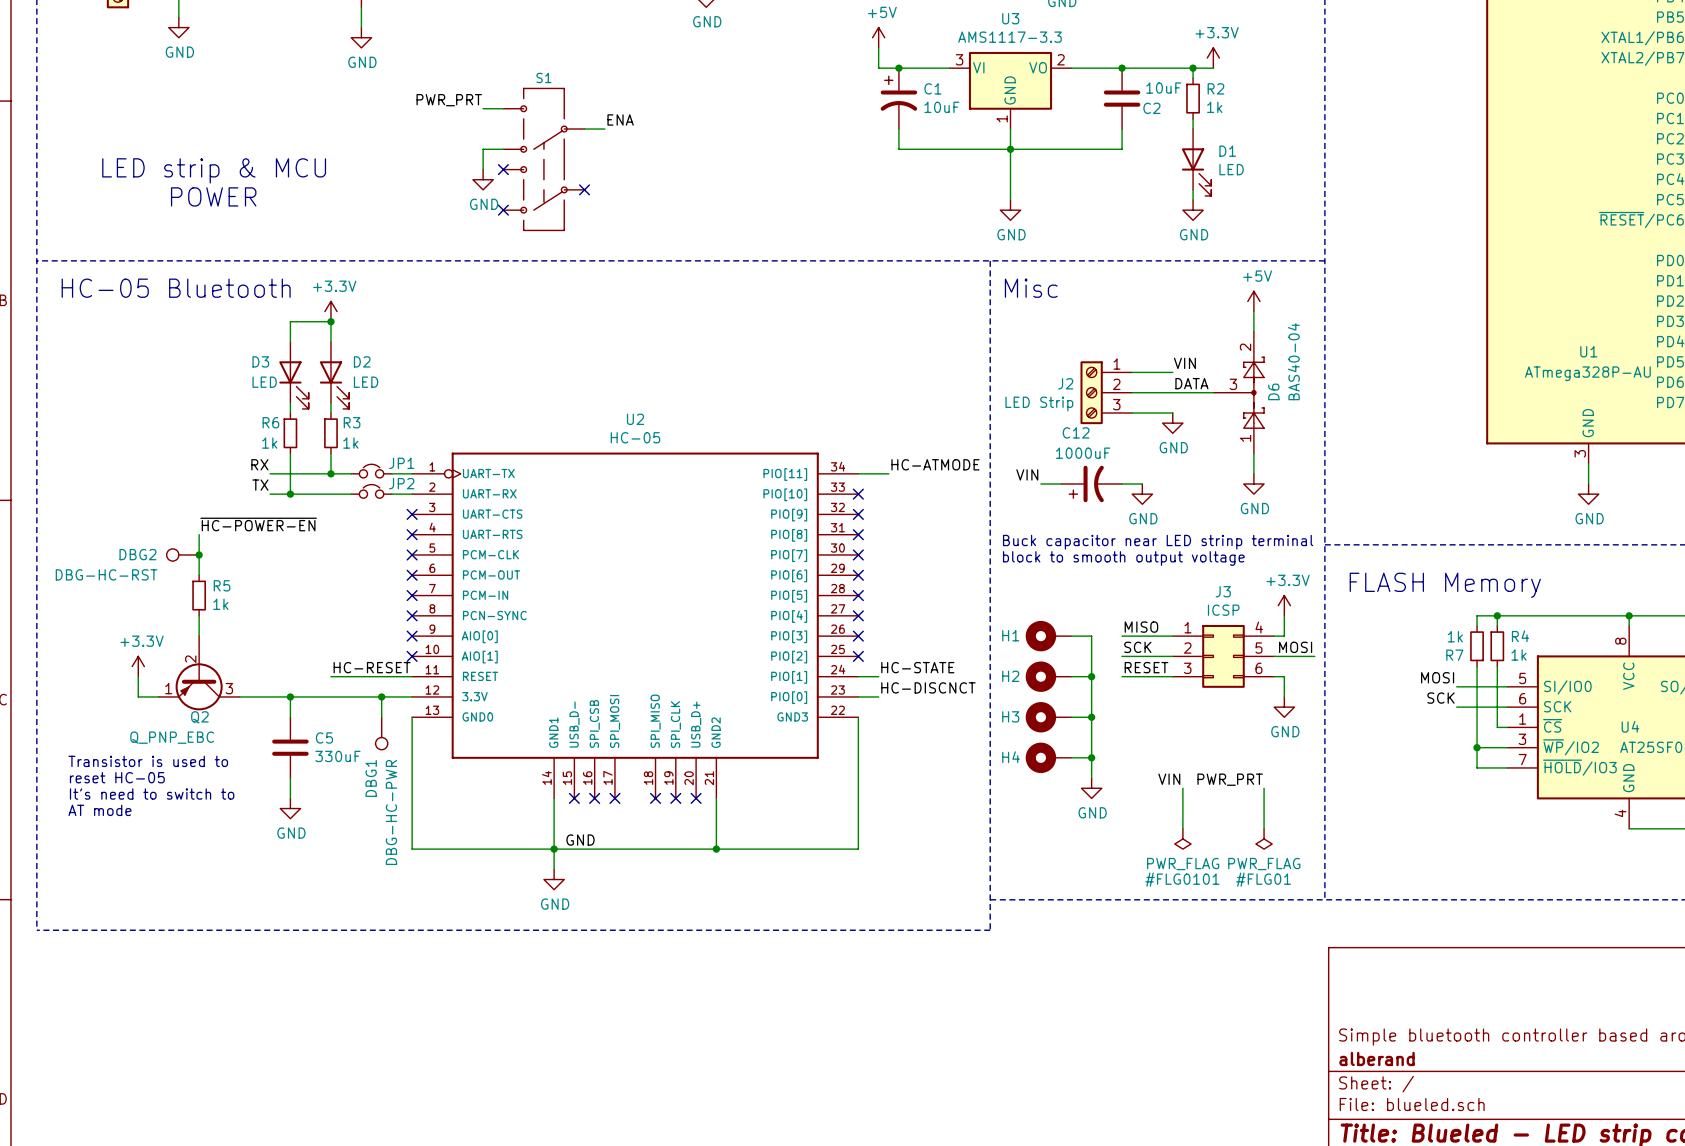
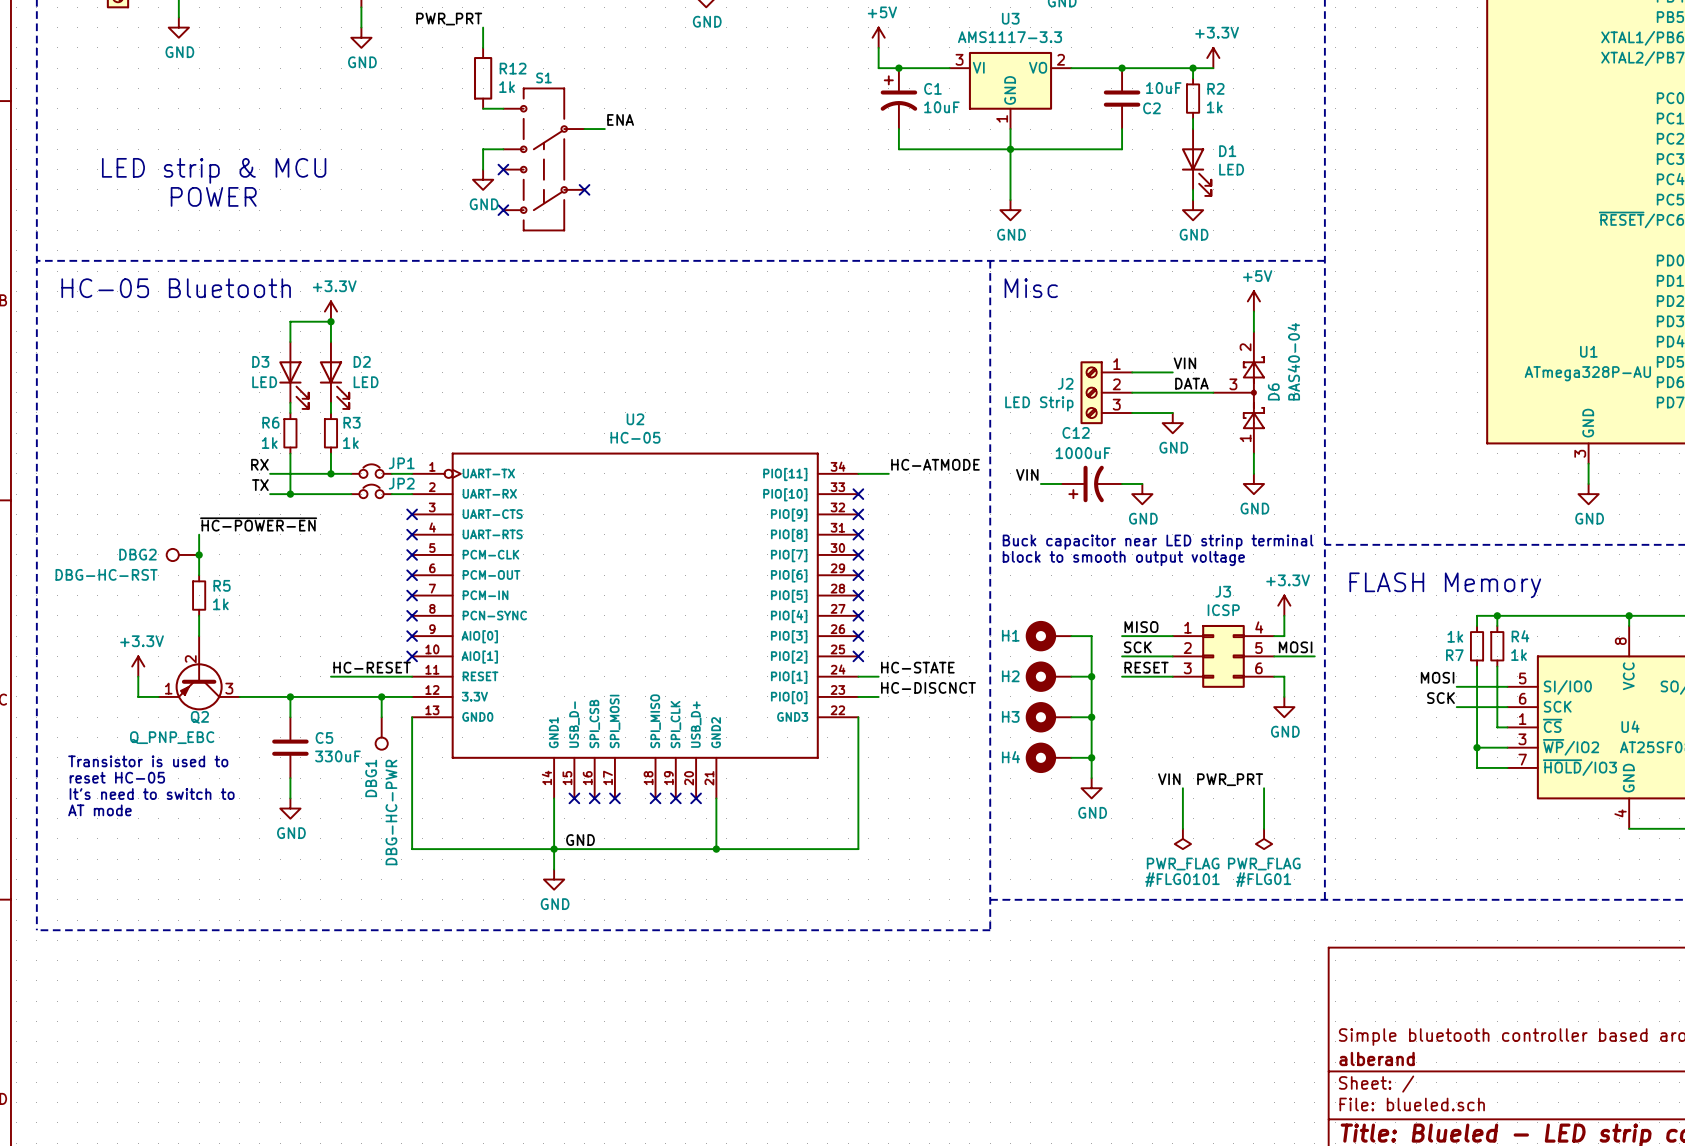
wire: none -> (483, 27) (483, 47)
R12: none -> 1k (483, 78)
label position: PWR_PRT (449, 100) -> PWR_PRT (449, 19)

